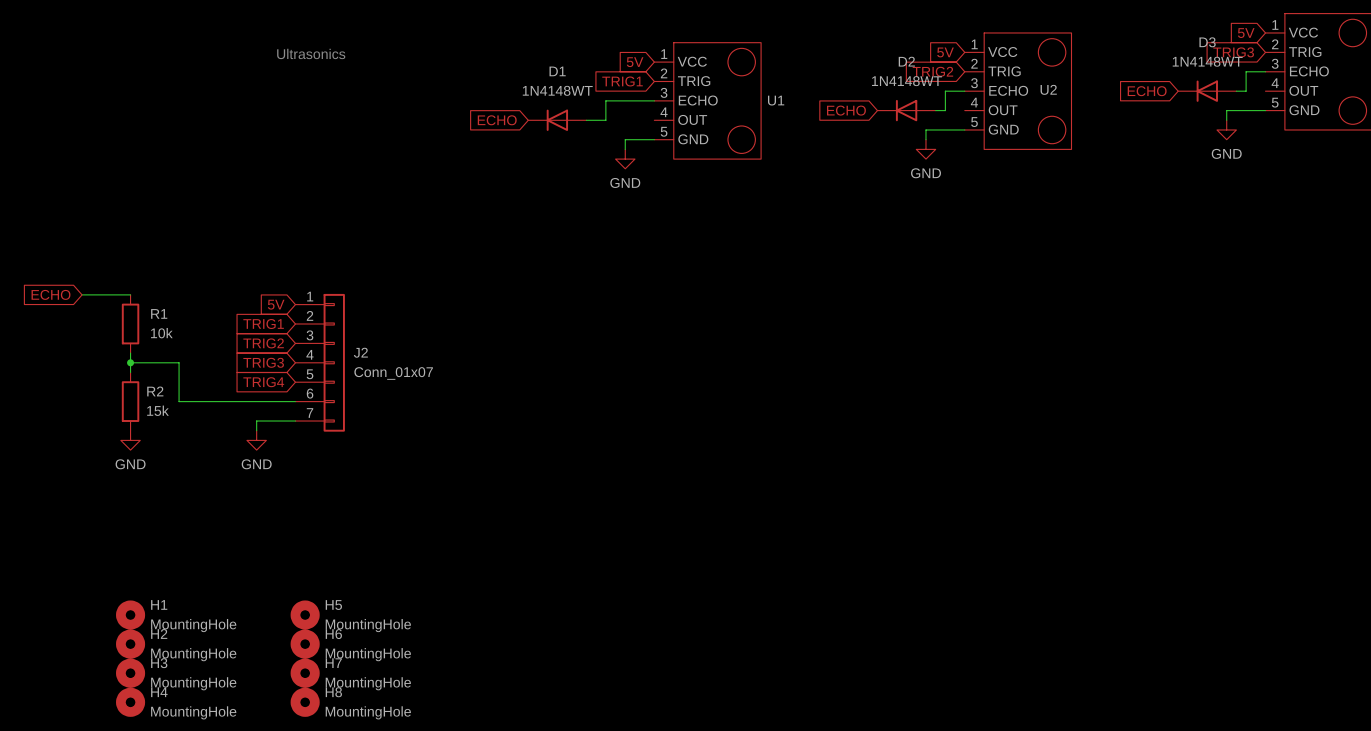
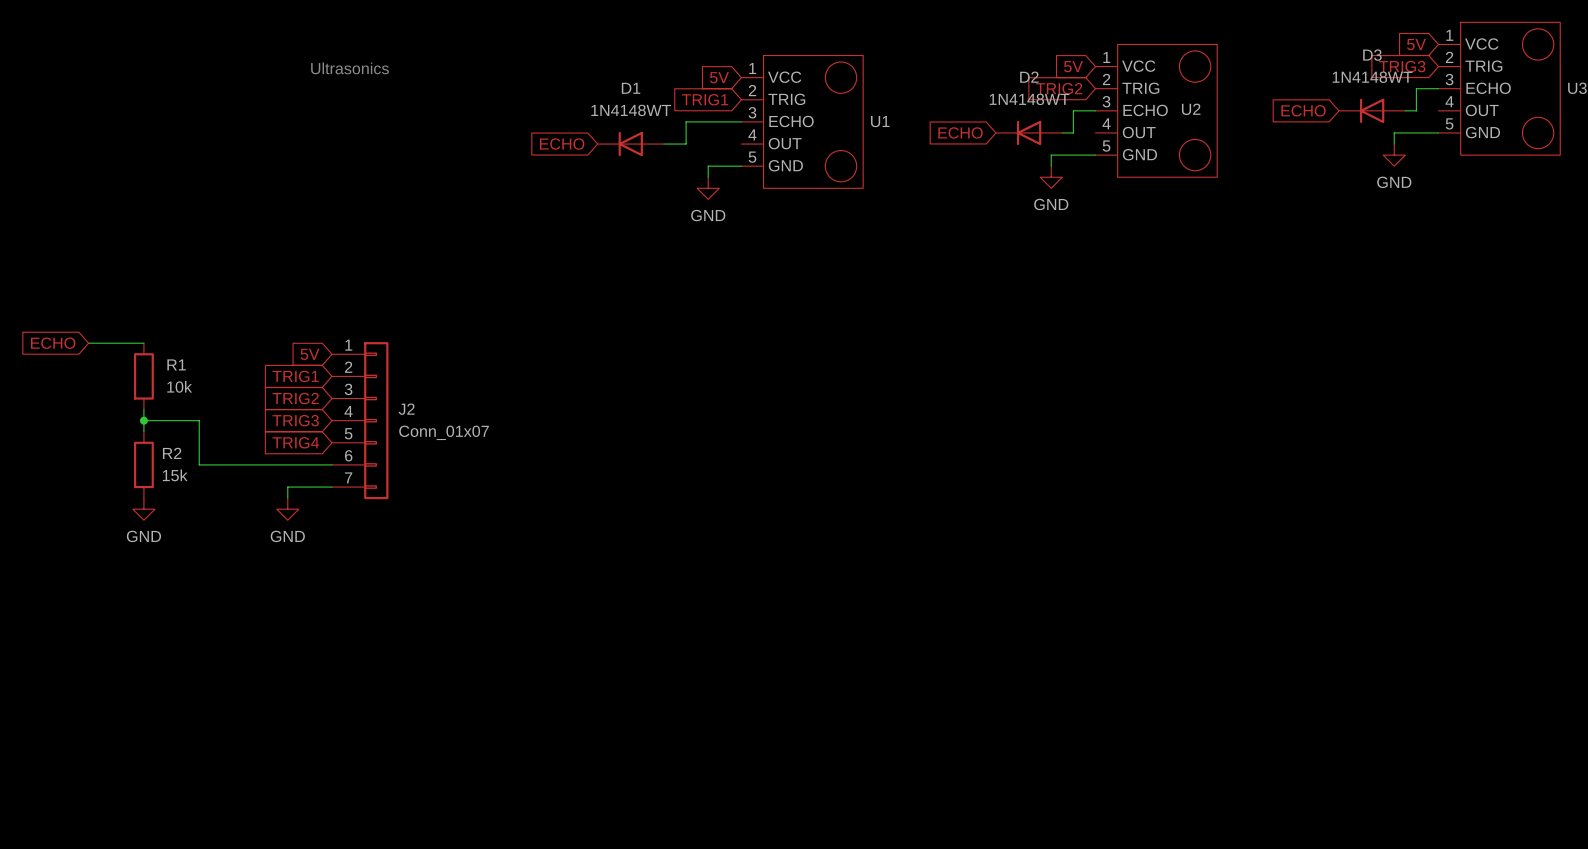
H1: MountingHole (130, 615) -> none
H5: MountingHole (305, 615) -> none
H2: MountingHole (130, 644) -> none
H6: MountingHole (305, 644) -> none
H3: MountingHole (130, 673) -> none
H7: MountingHole (305, 673) -> none
H4: MountingHole (130, 702) -> none
H8: MountingHole (305, 702) -> none

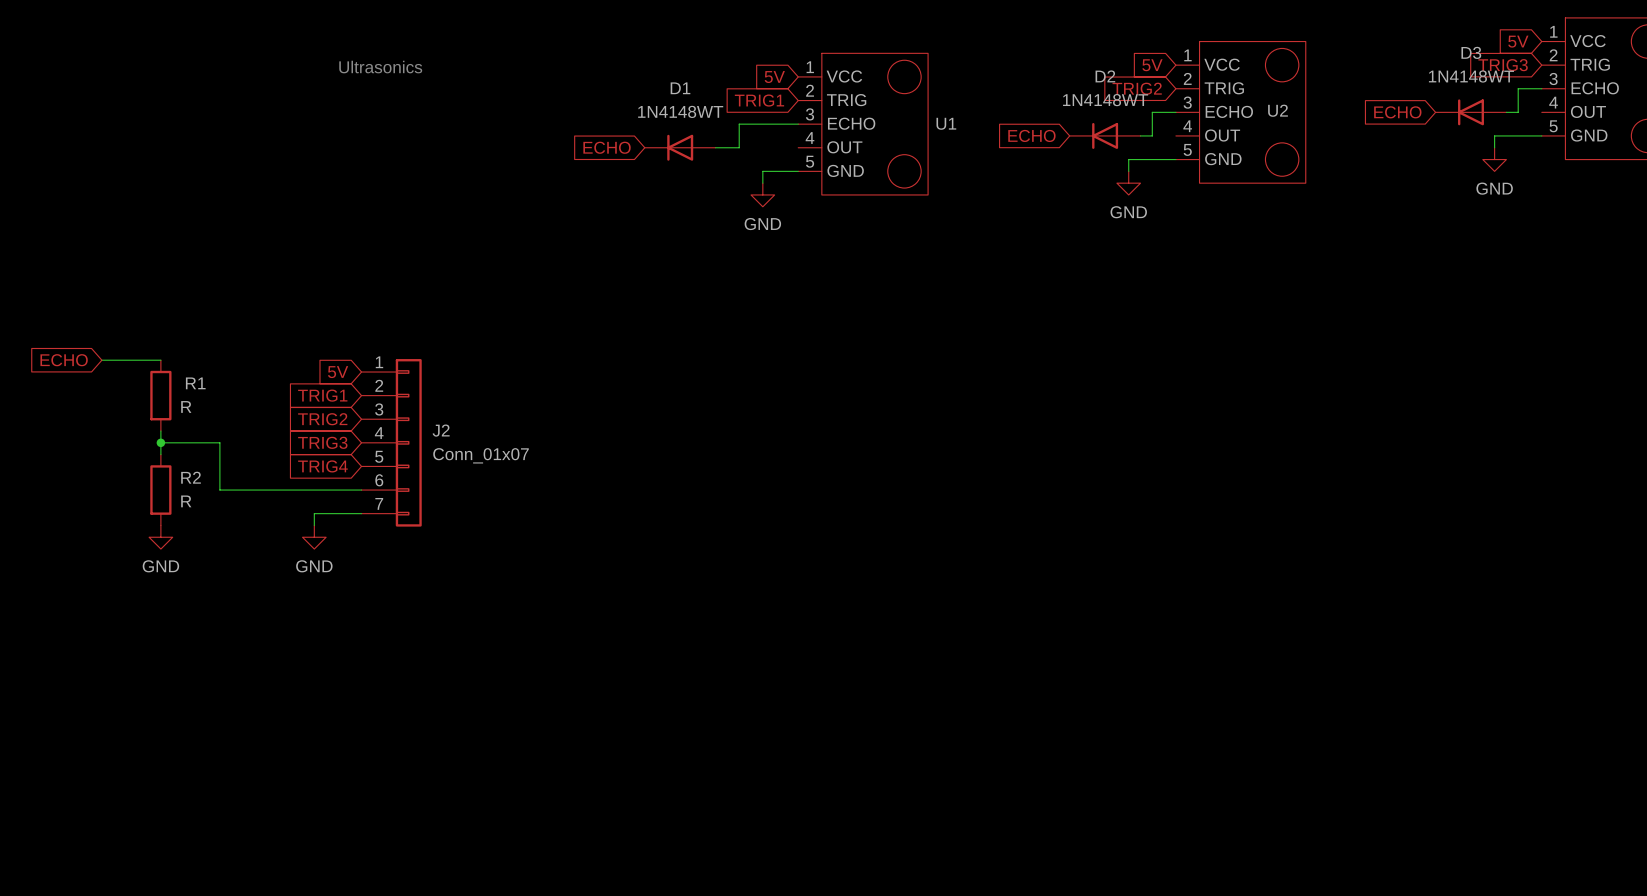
R1 value: 10k (179, 386) -> R (186, 406)
R2 value: 15k (175, 475) -> R (186, 501)

